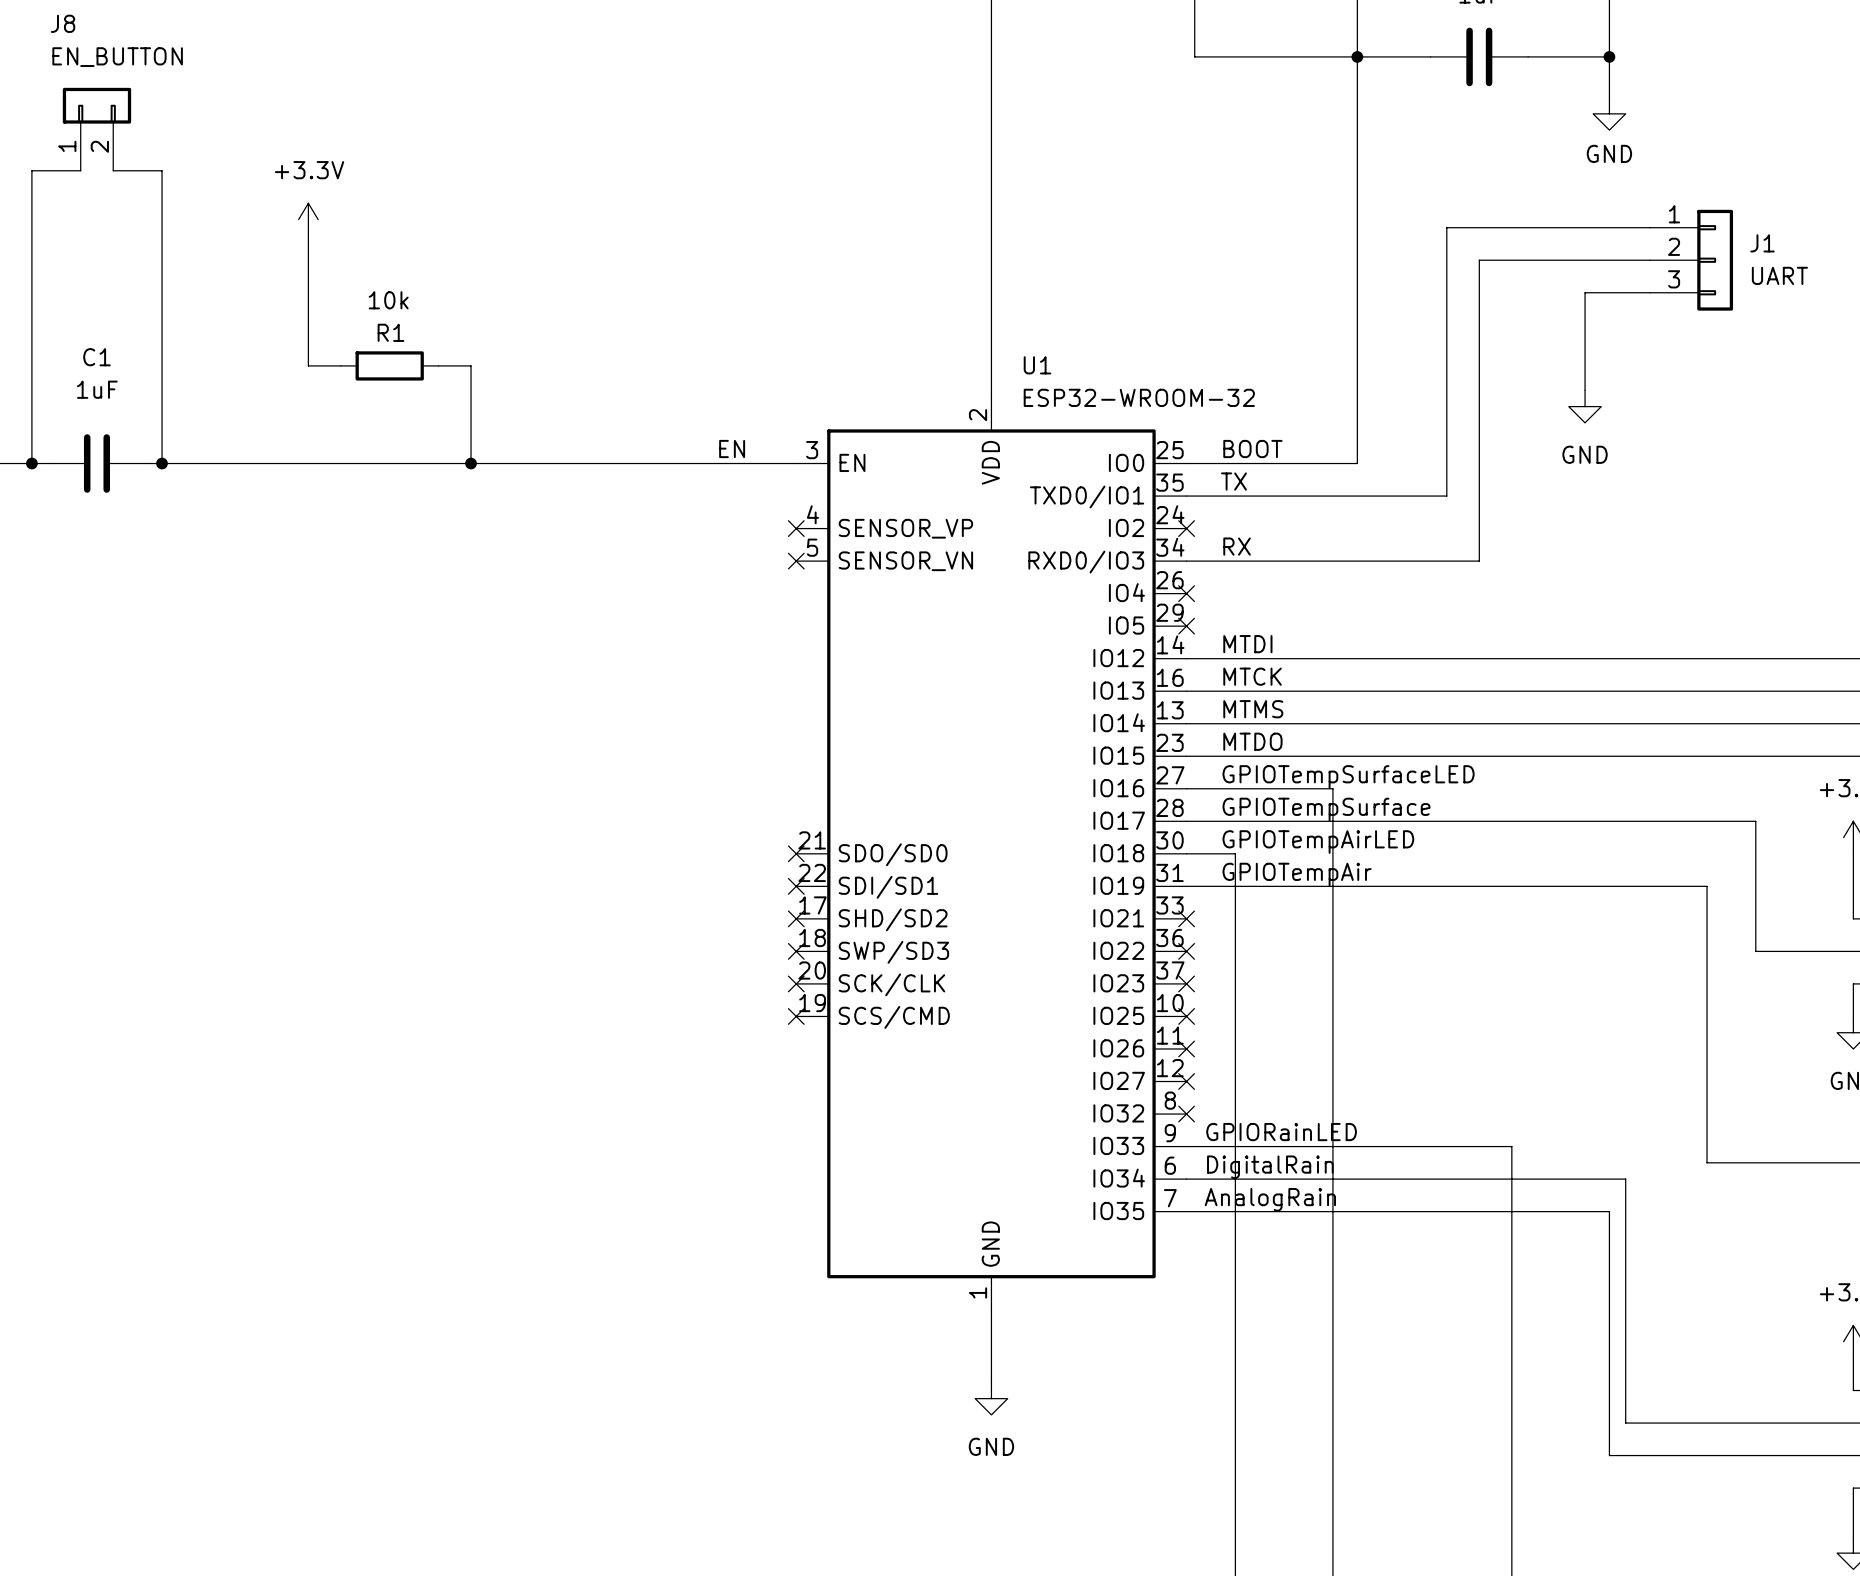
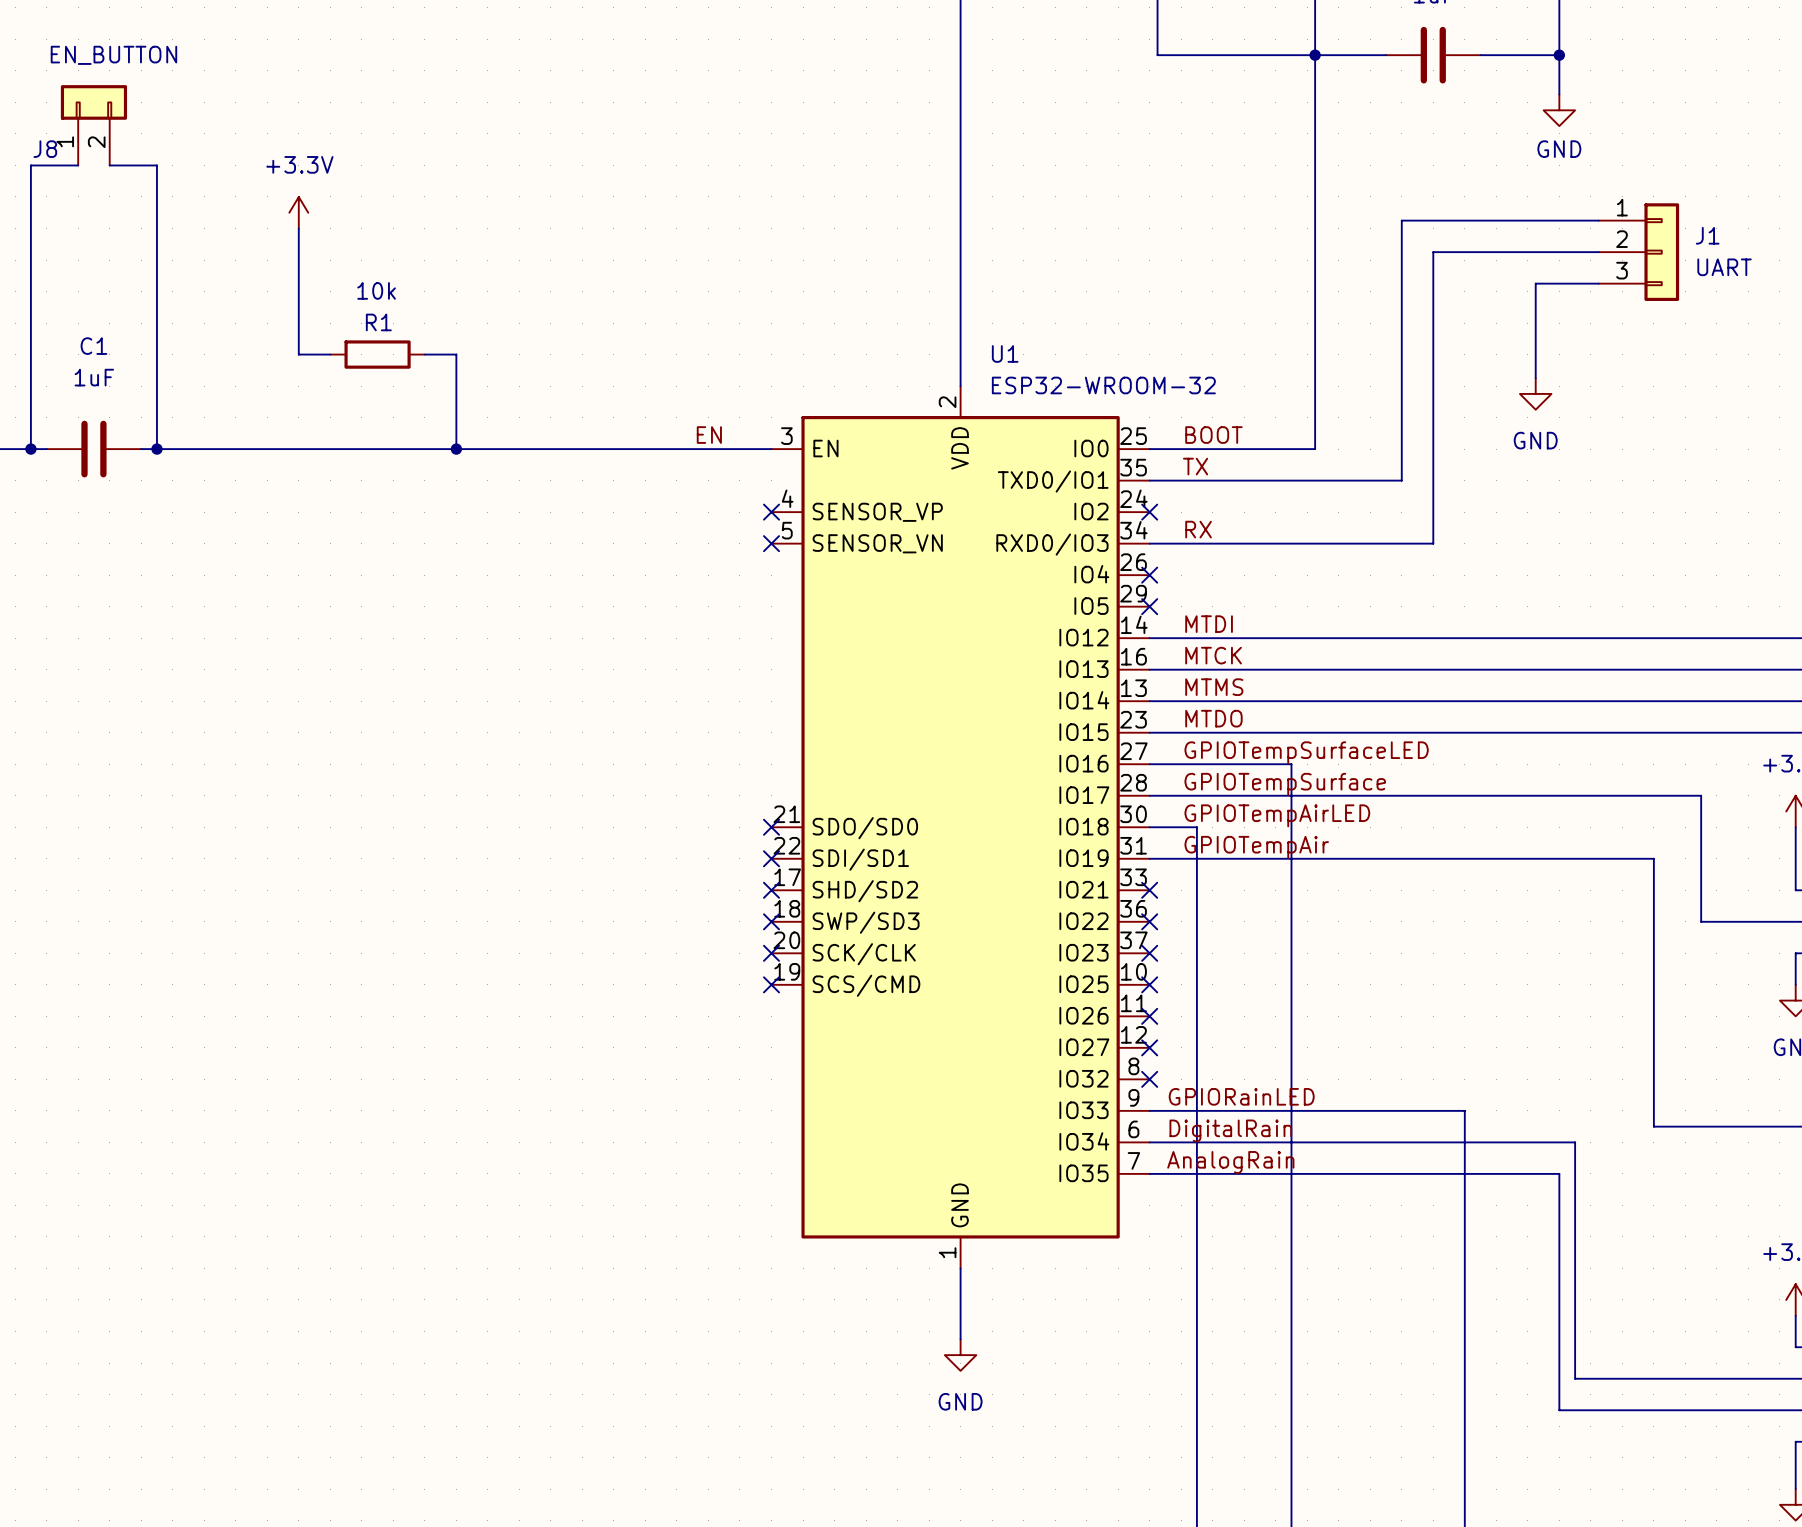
J8 name position: J8 (63, 23) -> J8 (45, 149)

